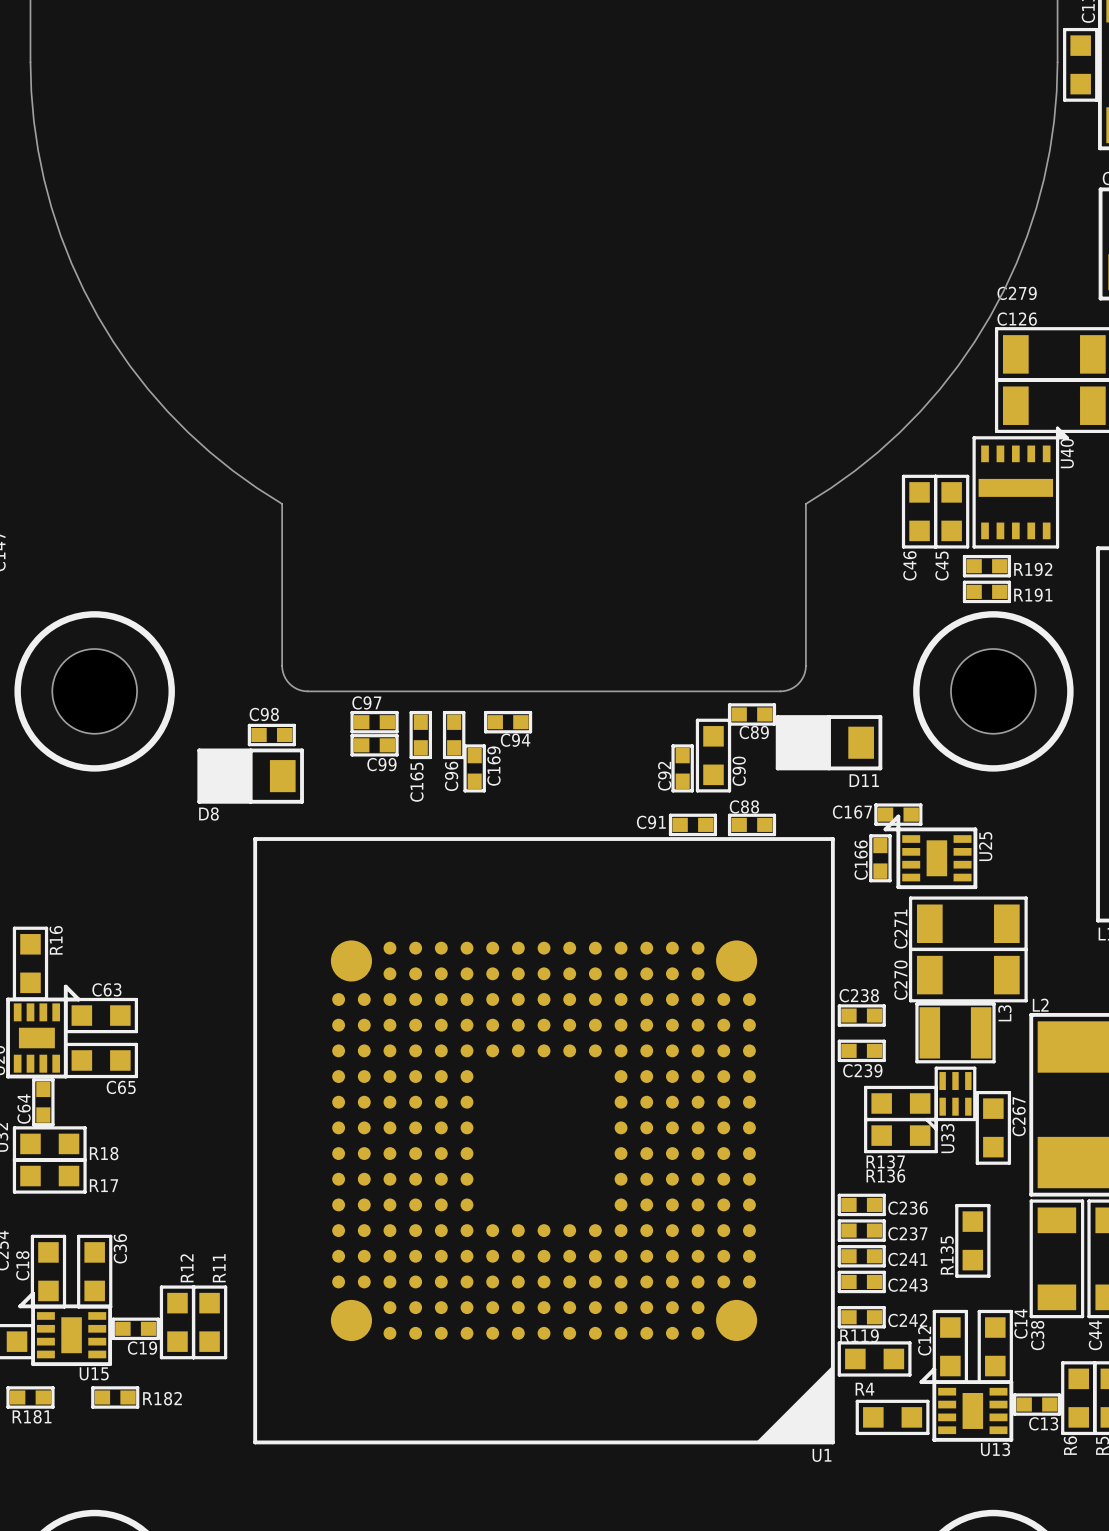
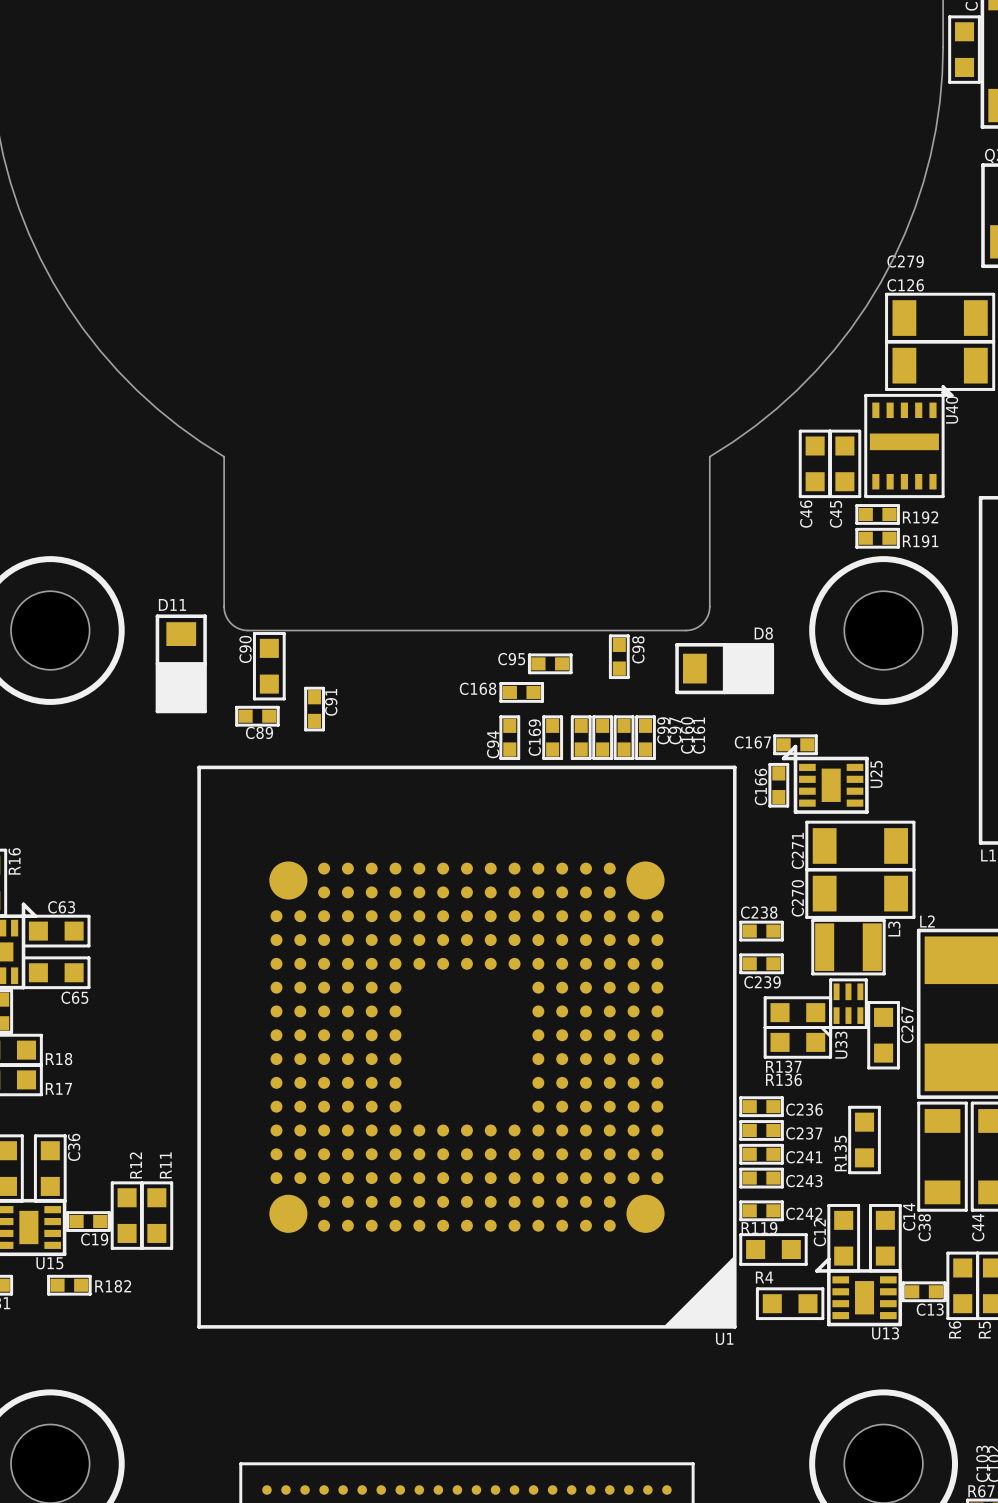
C97 name position: C97 (366, 702) -> C97 (675, 730)
C89 position: (752, 714) -> (257, 716)
C97 rotation: 0° (374, 722) -> 90° clockwise (602, 737)
C97 position: (374, 722) -> (602, 737)
C94 rotation: 0° (508, 722) -> 90° clockwise (509, 737)
C94 position: (508, 722) -> (509, 737)
C95: none -> (550, 663)
C98 rotation: 0° (271, 735) -> 90° clockwise (619, 656)
C98 position: (271, 735) -> (619, 656)
C165: (420, 735) -> none
C96: (454, 735) -> none
D11 rotation: 0° (829, 742) -> 90° counterclockwise (181, 663)
D11 position: (829, 742) -> (181, 663)
C99 rotation: 0° (374, 745) -> 90° clockwise (581, 737)
C99 position: (374, 745) -> (581, 737)
C90 position: (713, 755) -> (269, 666)
C168: none -> (521, 692)
C99 name position: C99 (381, 764) -> C99 (663, 730)
C169 name position: C169 (493, 766) -> C169 (534, 737)
C169 position: (474, 768) -> (552, 737)
C92: (682, 768) -> none
C90 name position: C90 (739, 771) -> C90 (245, 649)
D8 rotation: 0° (250, 776) -> 180° (724, 668)
D8 position: (250, 776) -> (724, 668)
D11 name position: D11 (864, 780) -> D11 (172, 604)
C160: none -> (624, 737)
C161: none -> (645, 737)
C91 rotation: 0° (692, 824) -> 90° clockwise (314, 709)
C91 position: (692, 824) -> (314, 709)
C88: (752, 824) -> none

